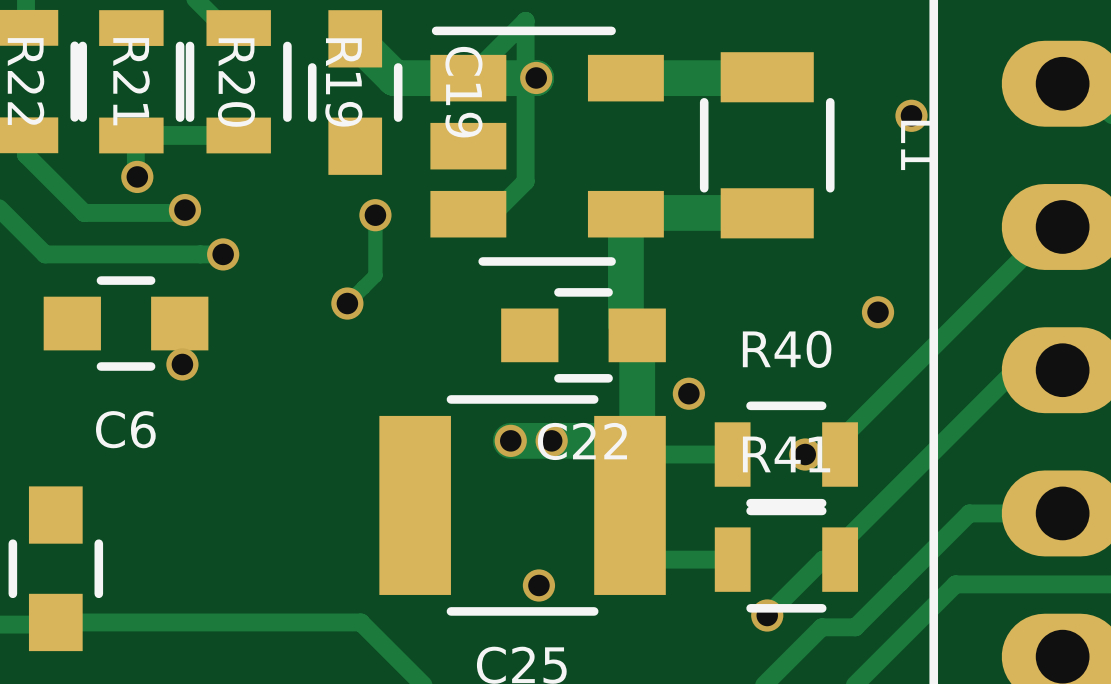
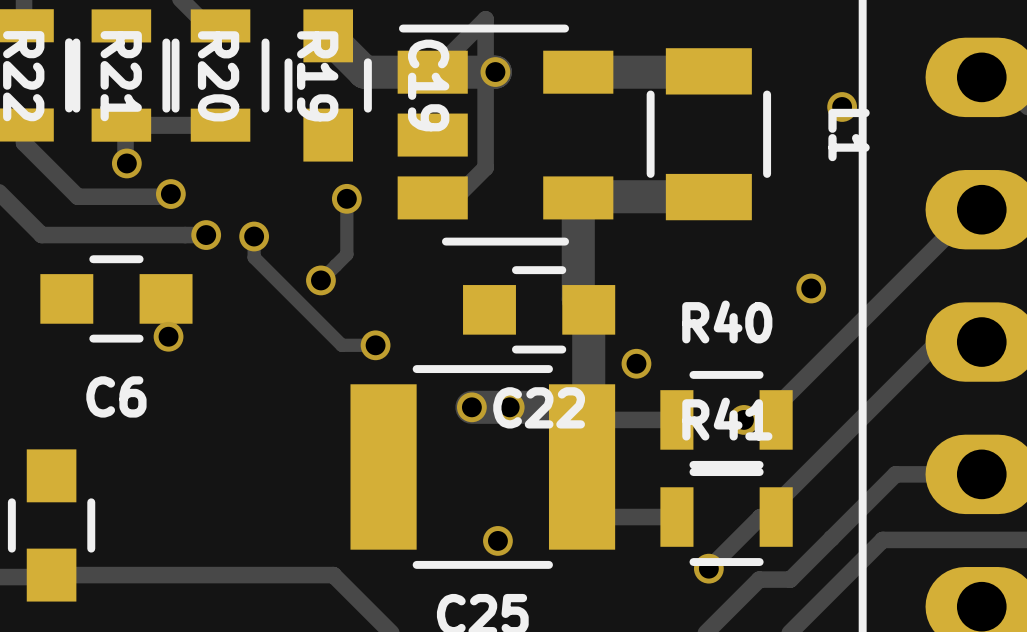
track: none -> (254, 236) (254, 257) (341, 345) (375, 345)
via: none -> (254, 236)
via: none -> (375, 345)

